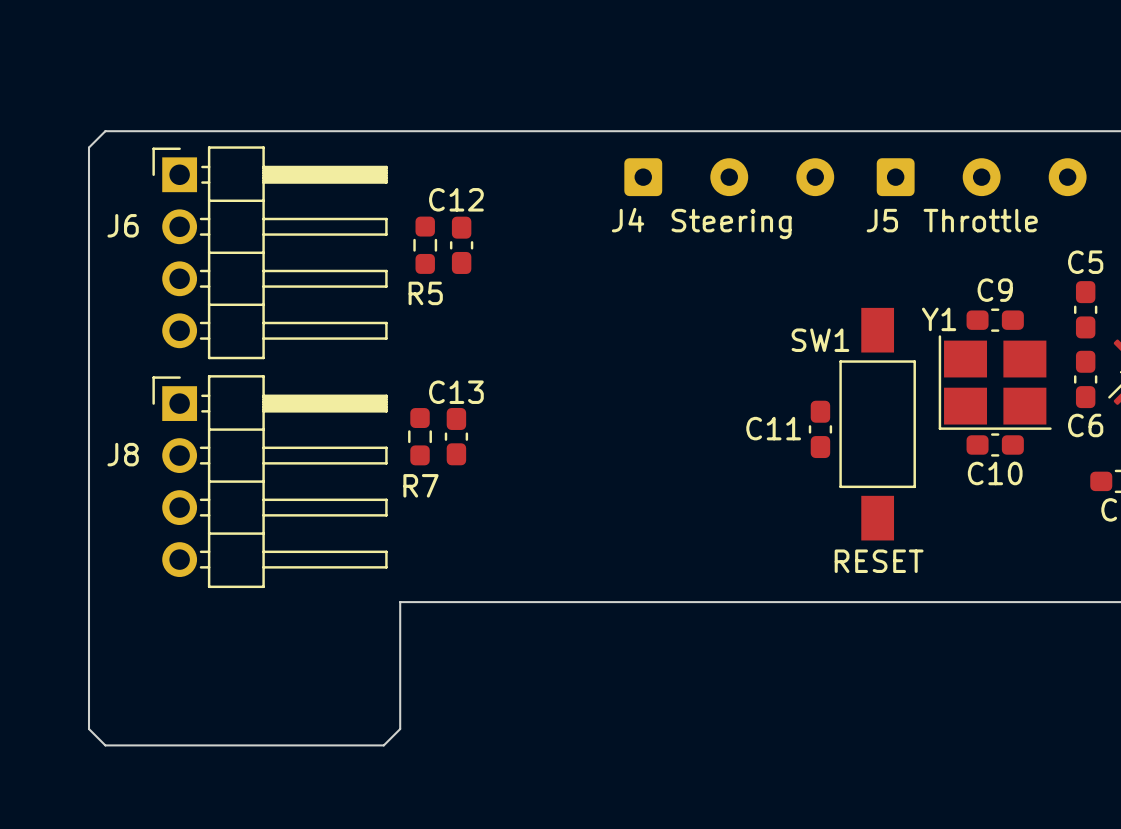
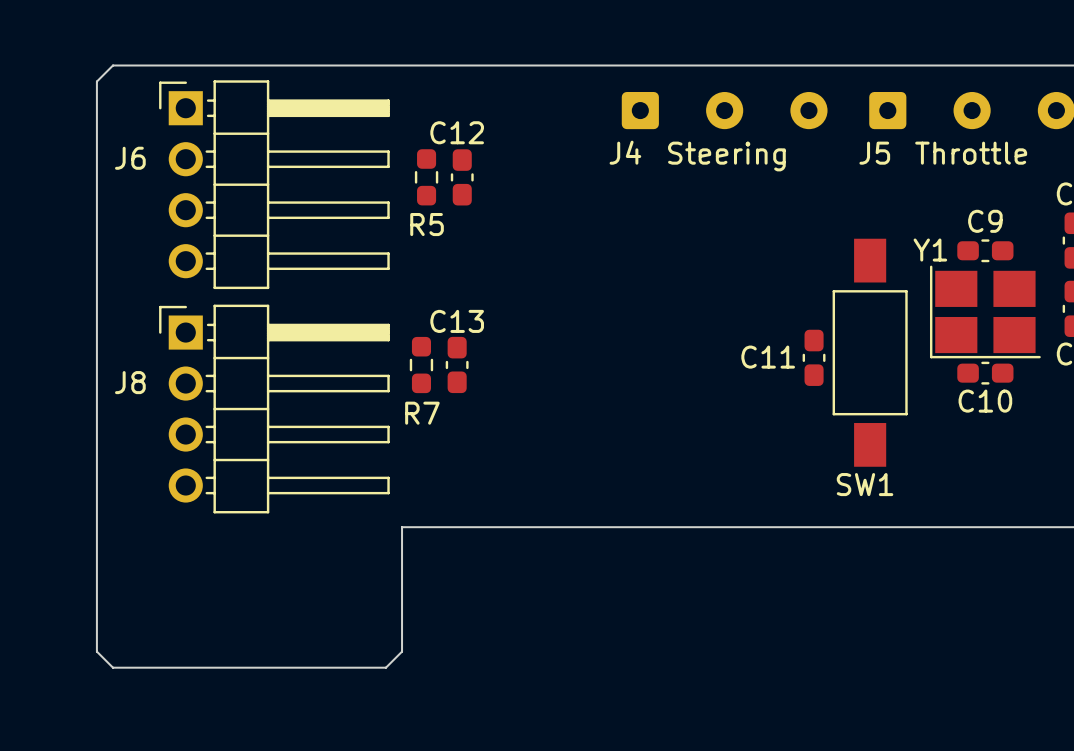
SW1 name position: SW1 (820, 340) -> SW1 (865, 484)
text: RESET (879, 561) -> none

